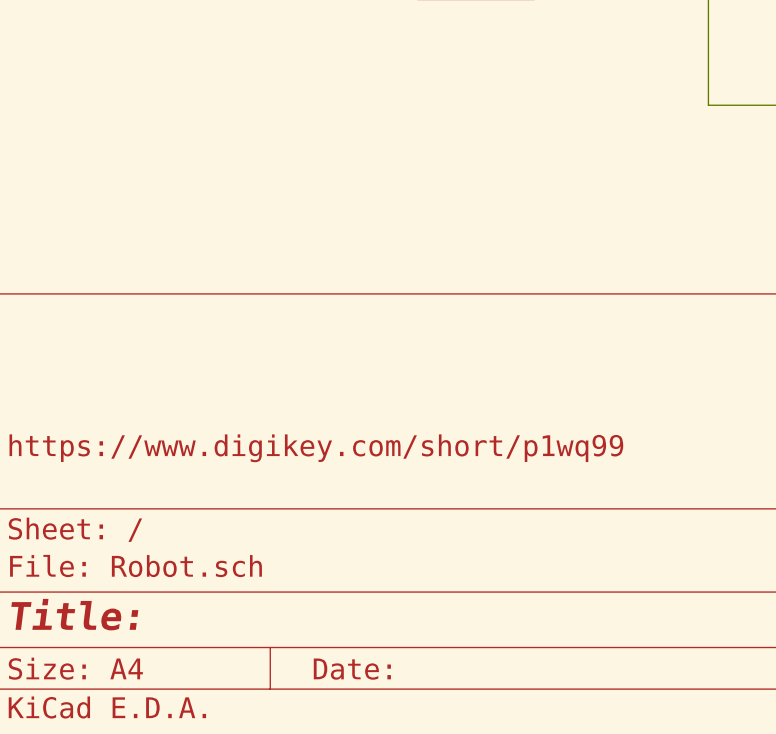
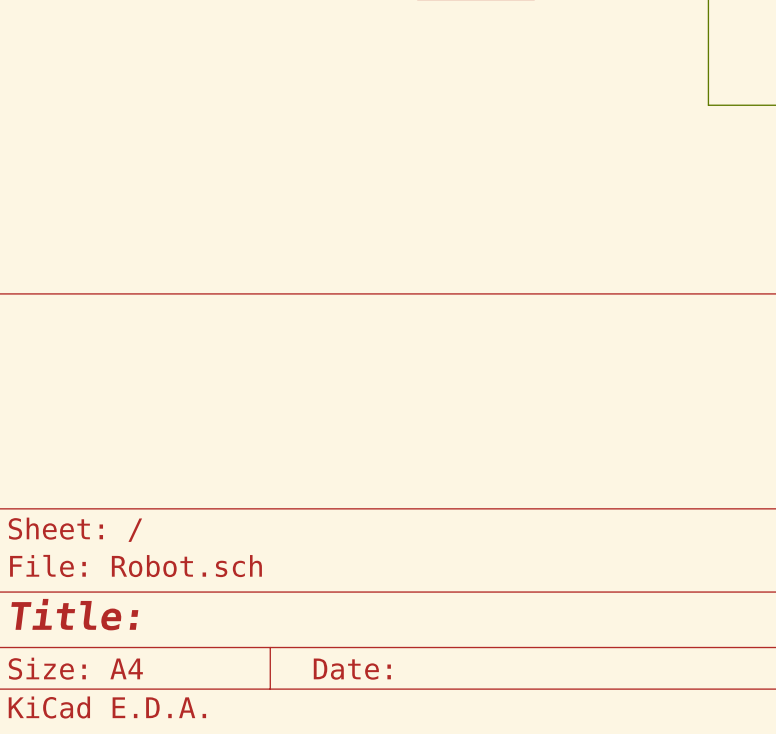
title block: https://www.digikey.com/short/p1wq99 (316, 448) -> none

